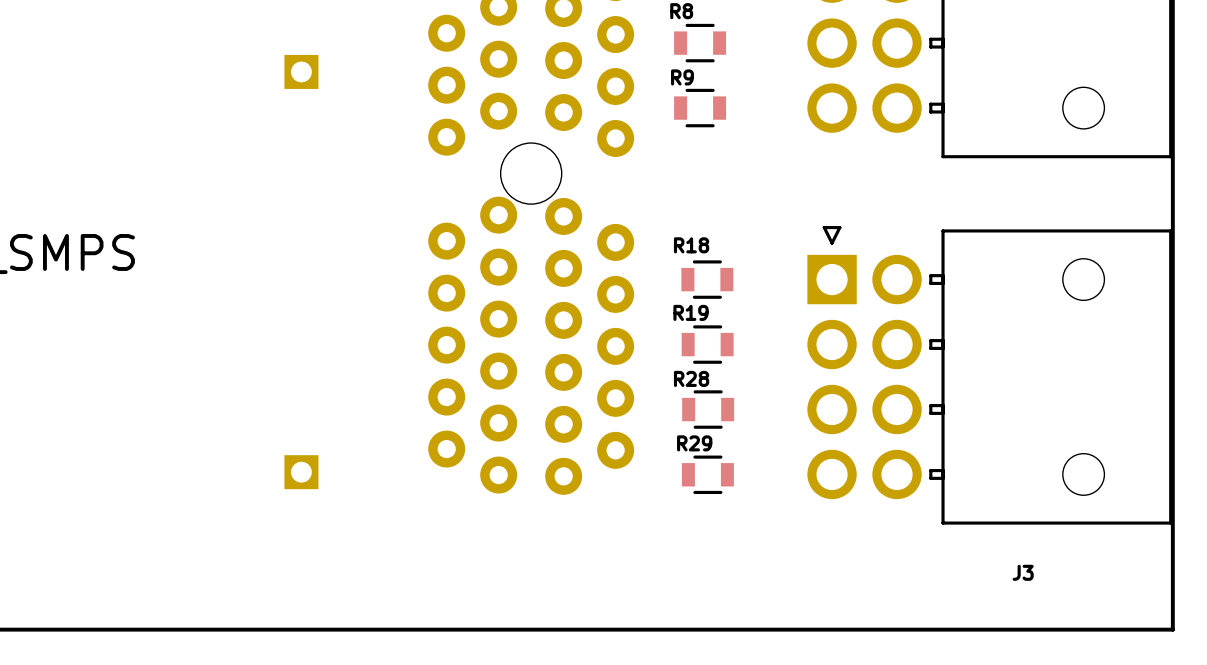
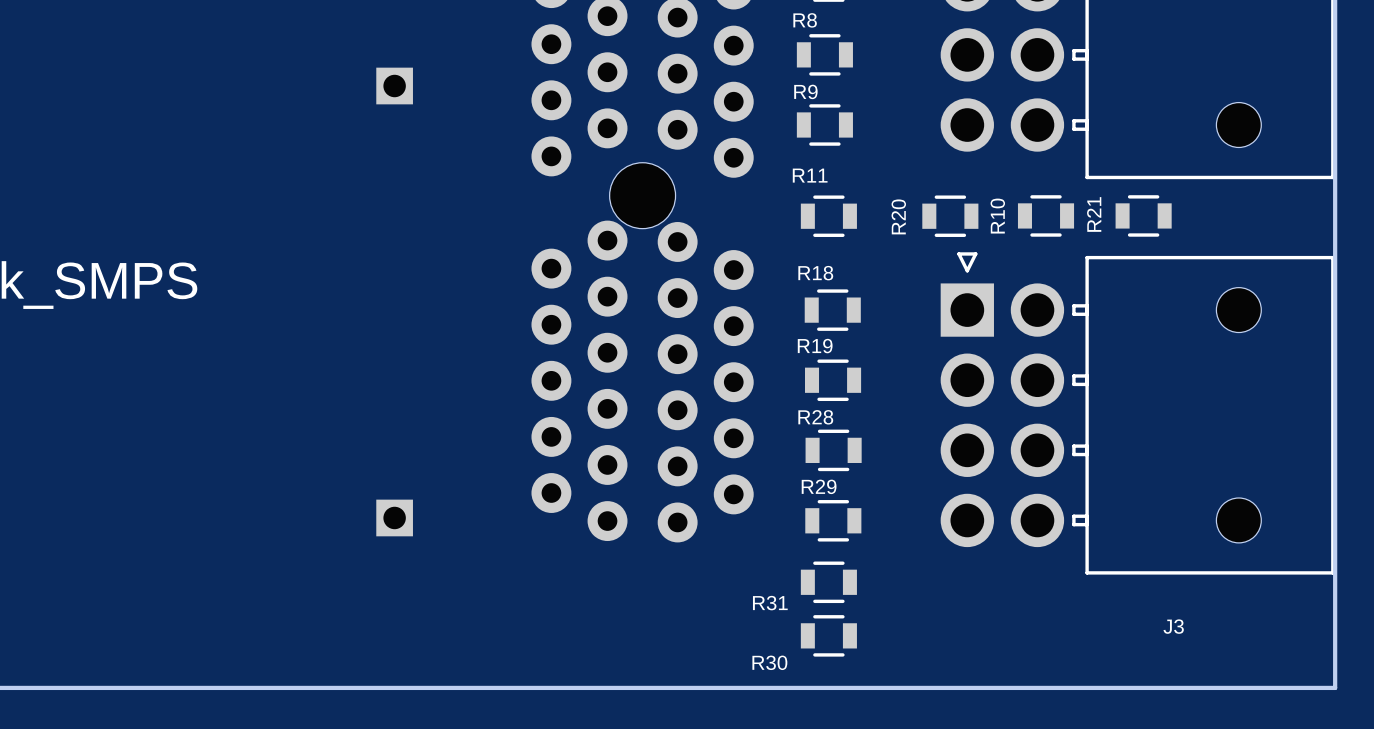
R11: none -> (828, 216)
R20: none -> (950, 216)
R10: none -> (1046, 215)
R21: none -> (1143, 215)
R31: none -> (828, 582)
R30: none -> (828, 635)

